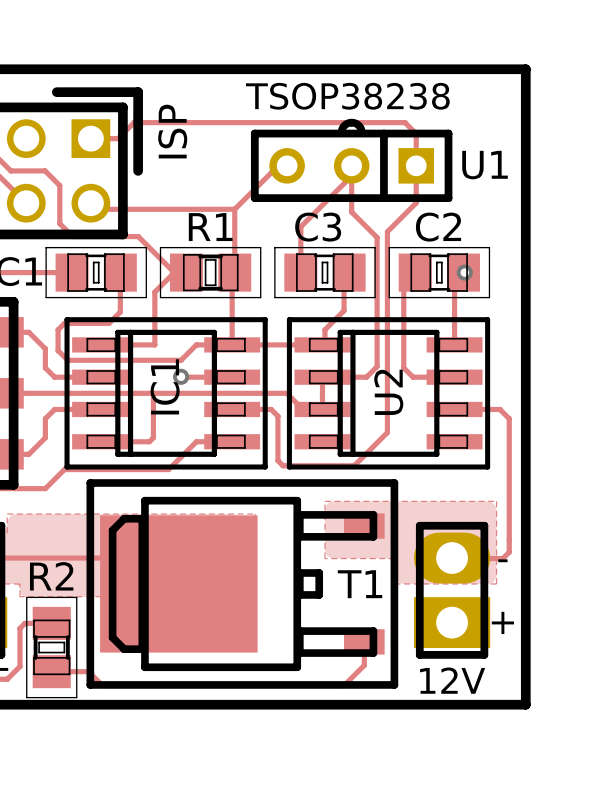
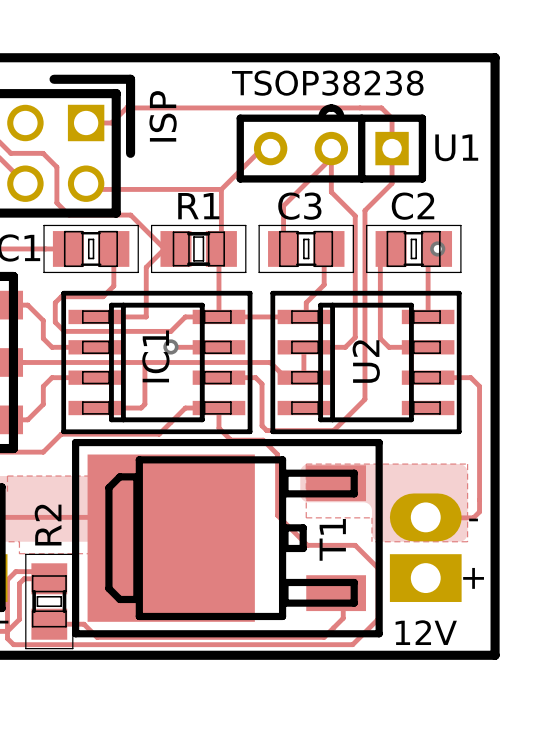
track: none -> (218, 408) (218, 428) (230, 440) (263, 440) (277, 454) (277, 515) (307, 545) (355, 545) (377, 568) (377, 619) (352, 644) (13, 644) (7, 638) (7, 579) (15, 571) (43, 571)
T1 footprint: [86, 479, 399, 689] -> [72, 438, 383, 638]
part footprint: [413, 521, 491, 659] -> [389, 493, 462, 602]
R2 name rotation: 0° (51, 576) -> 90° counterclockwise (48, 525)

